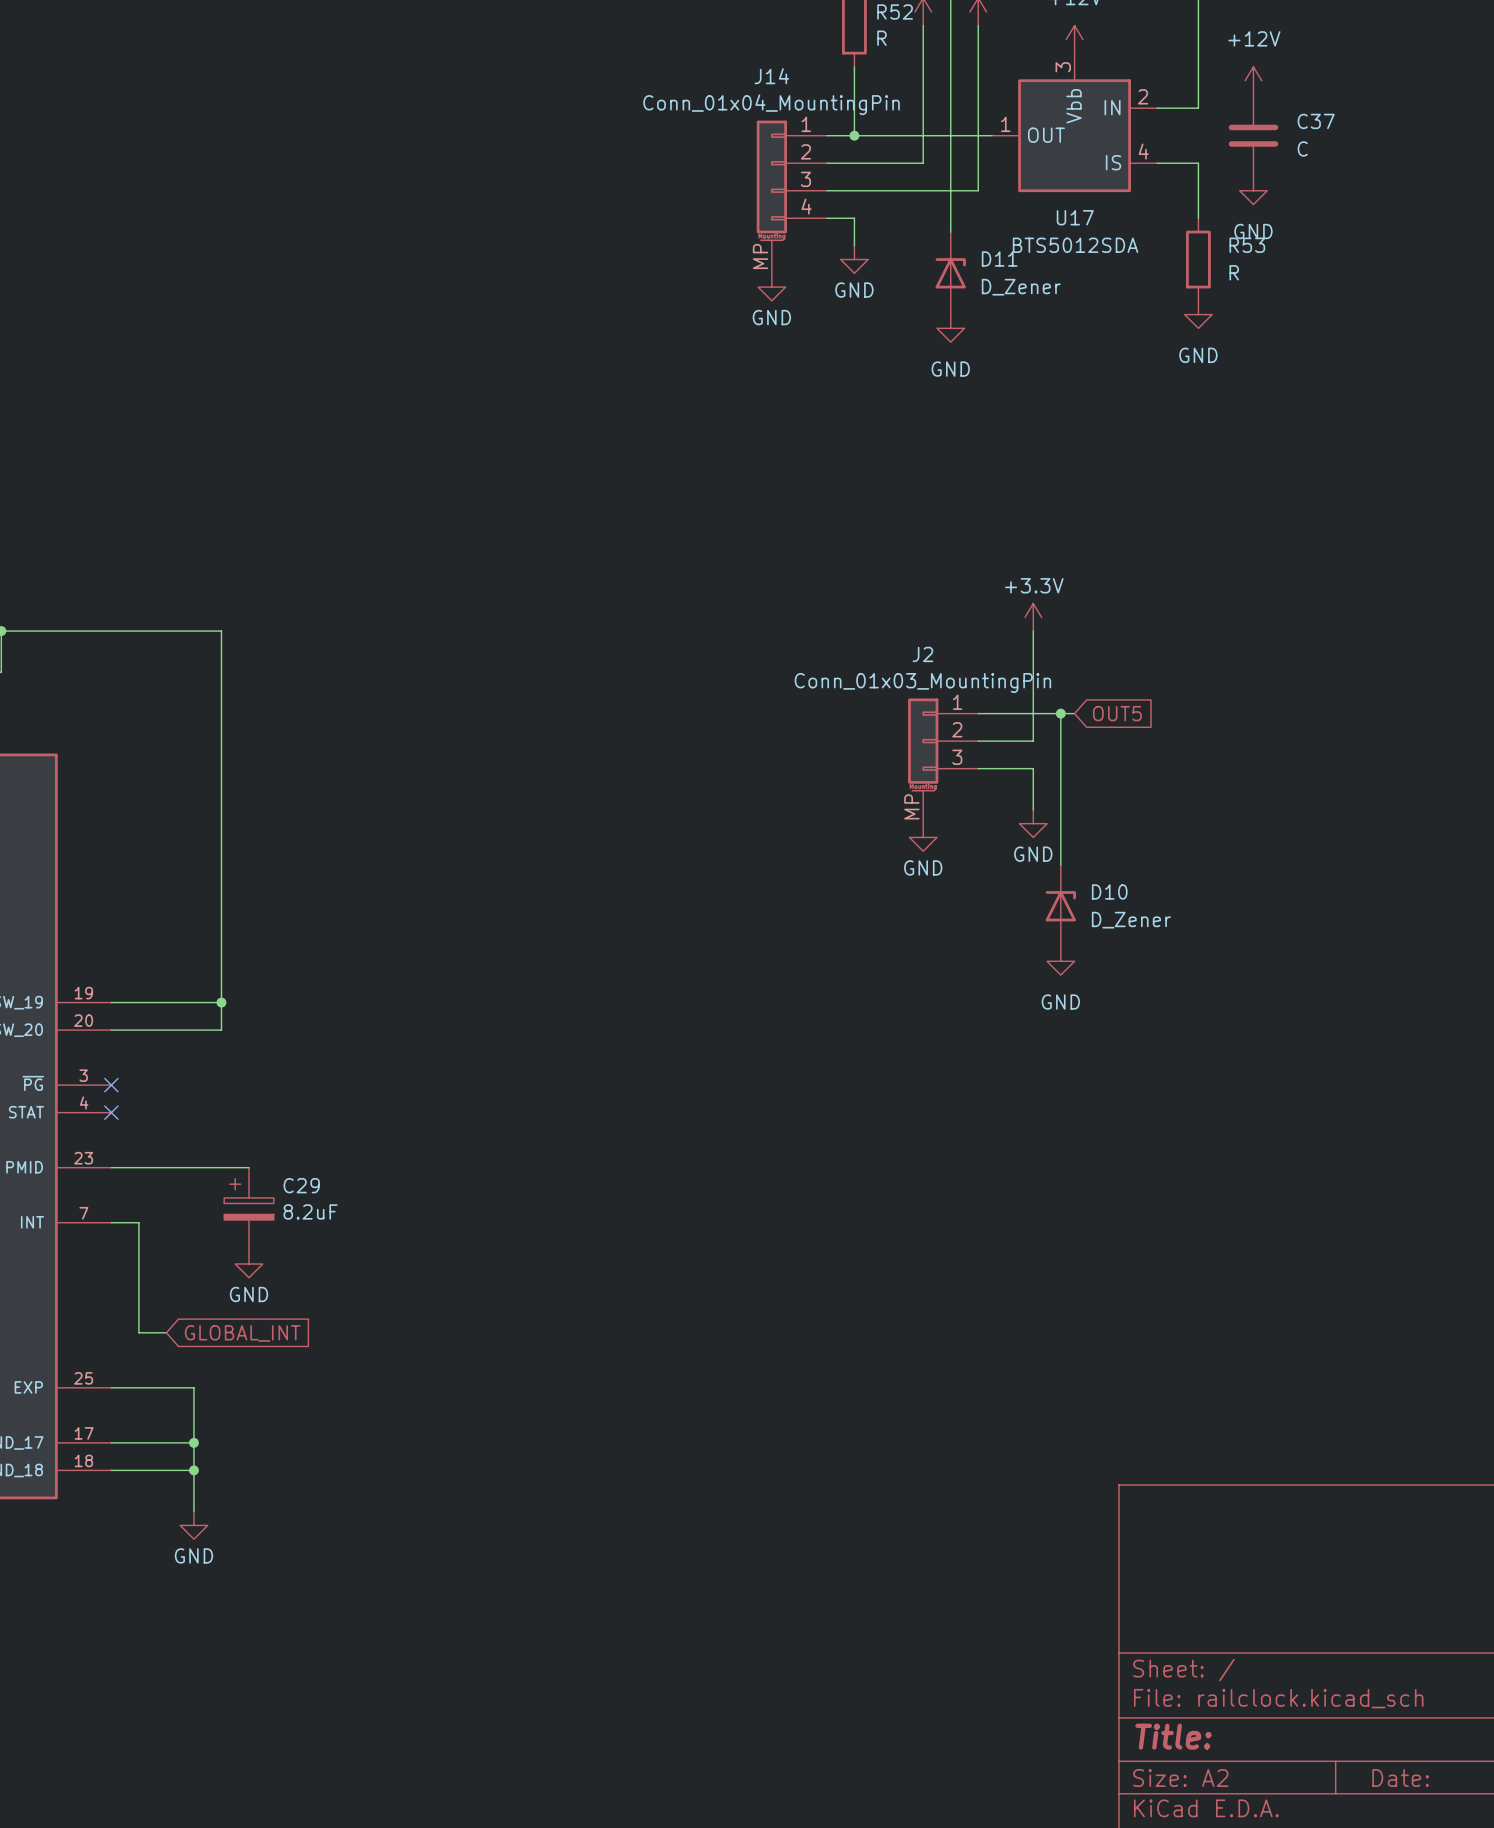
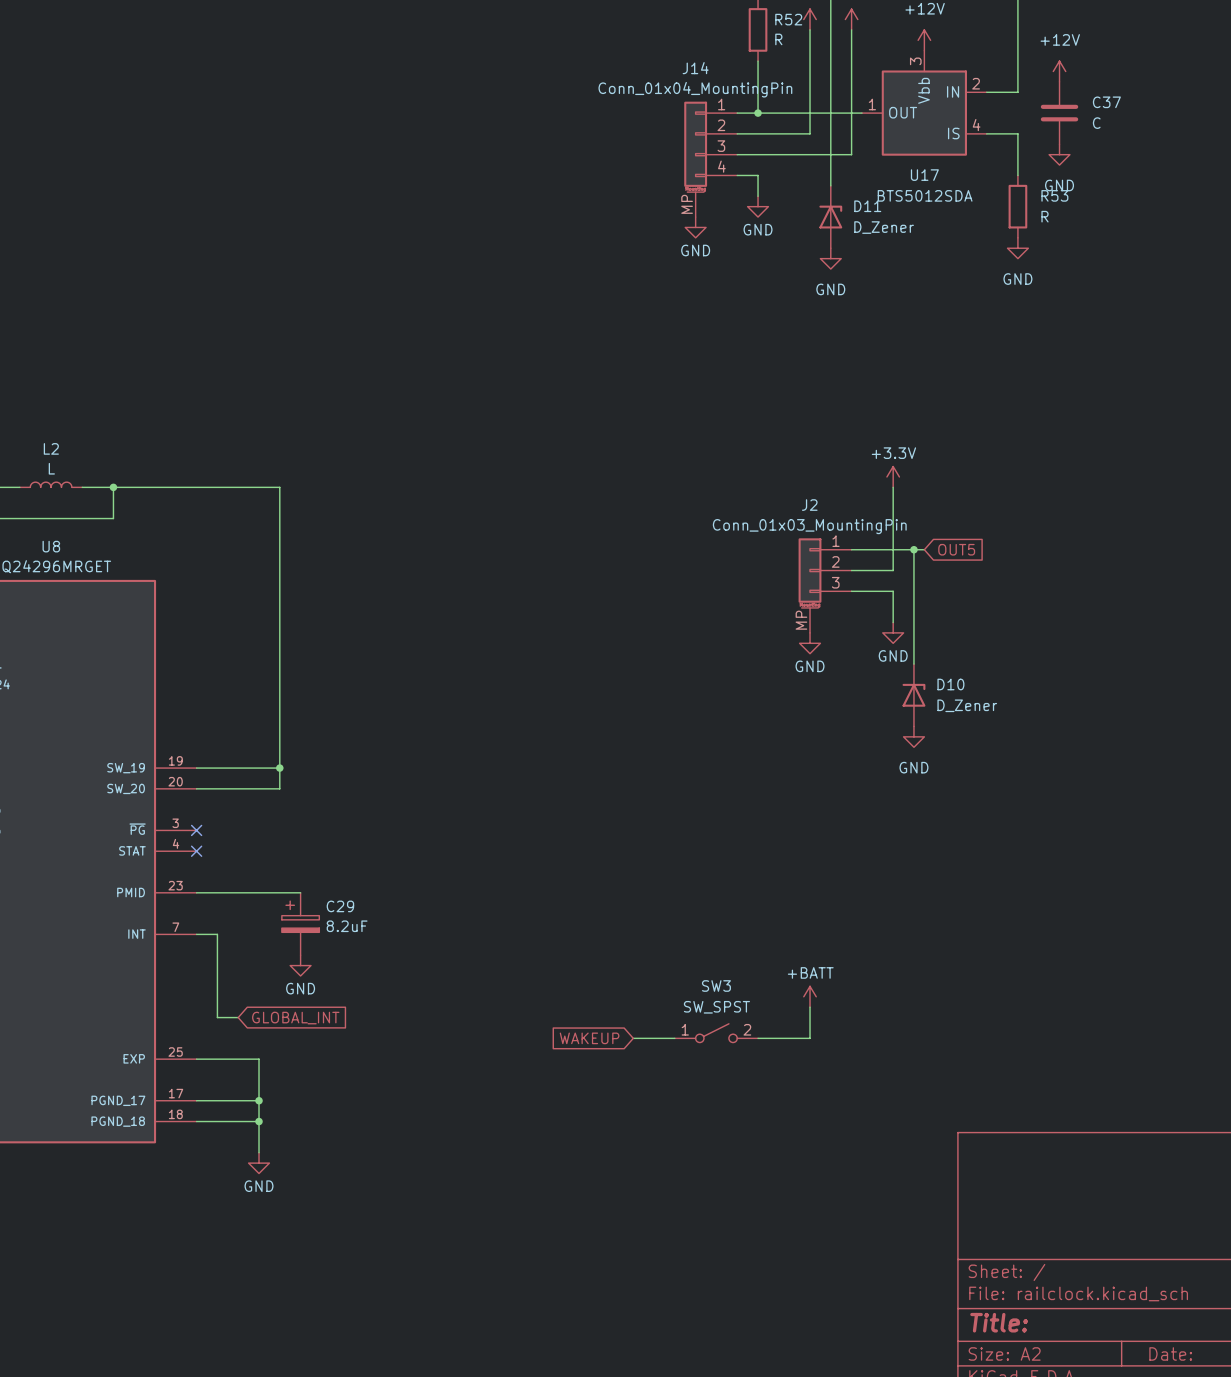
power symbol: none -> +BATT (810, 996)
wire: none -> (810, 1007) (810, 1038) (758, 1038)
SW3: none -> SW_SPST (716, 1033)
global label: none -> WAKEUP (589, 1038)
wire: none -> (633, 1038) (674, 1038)

